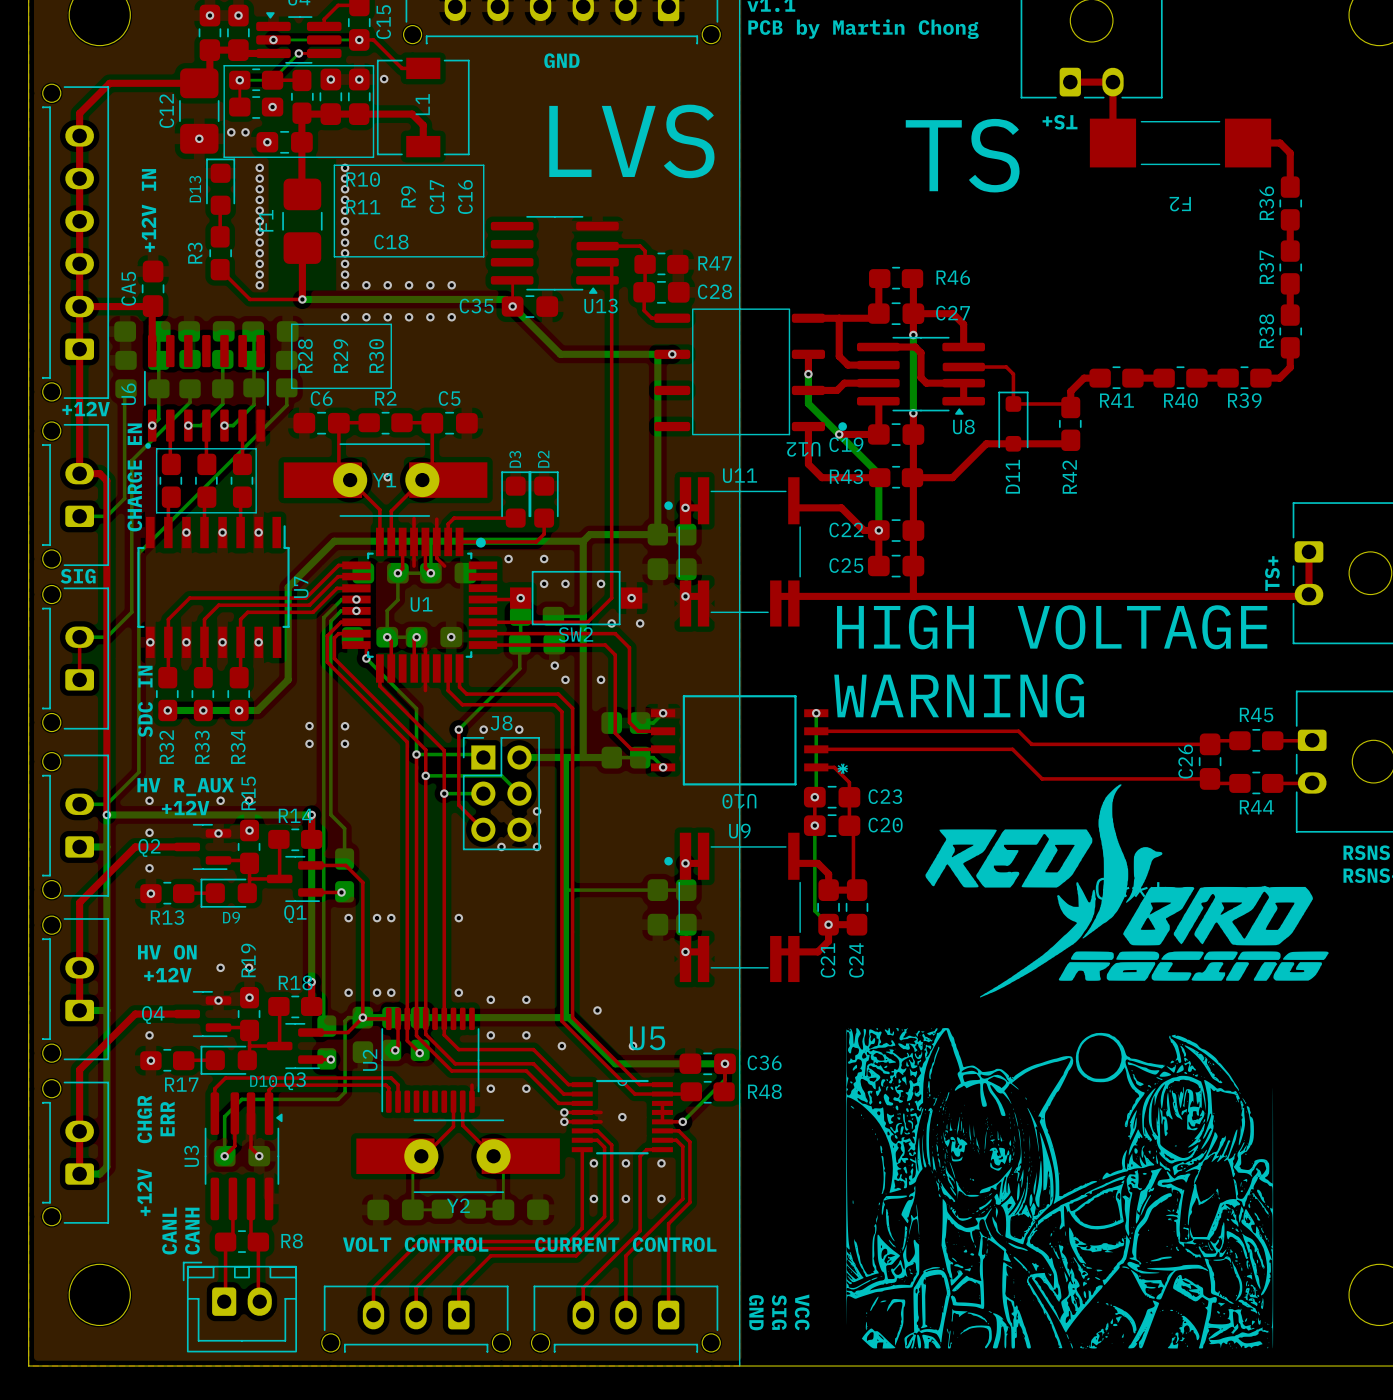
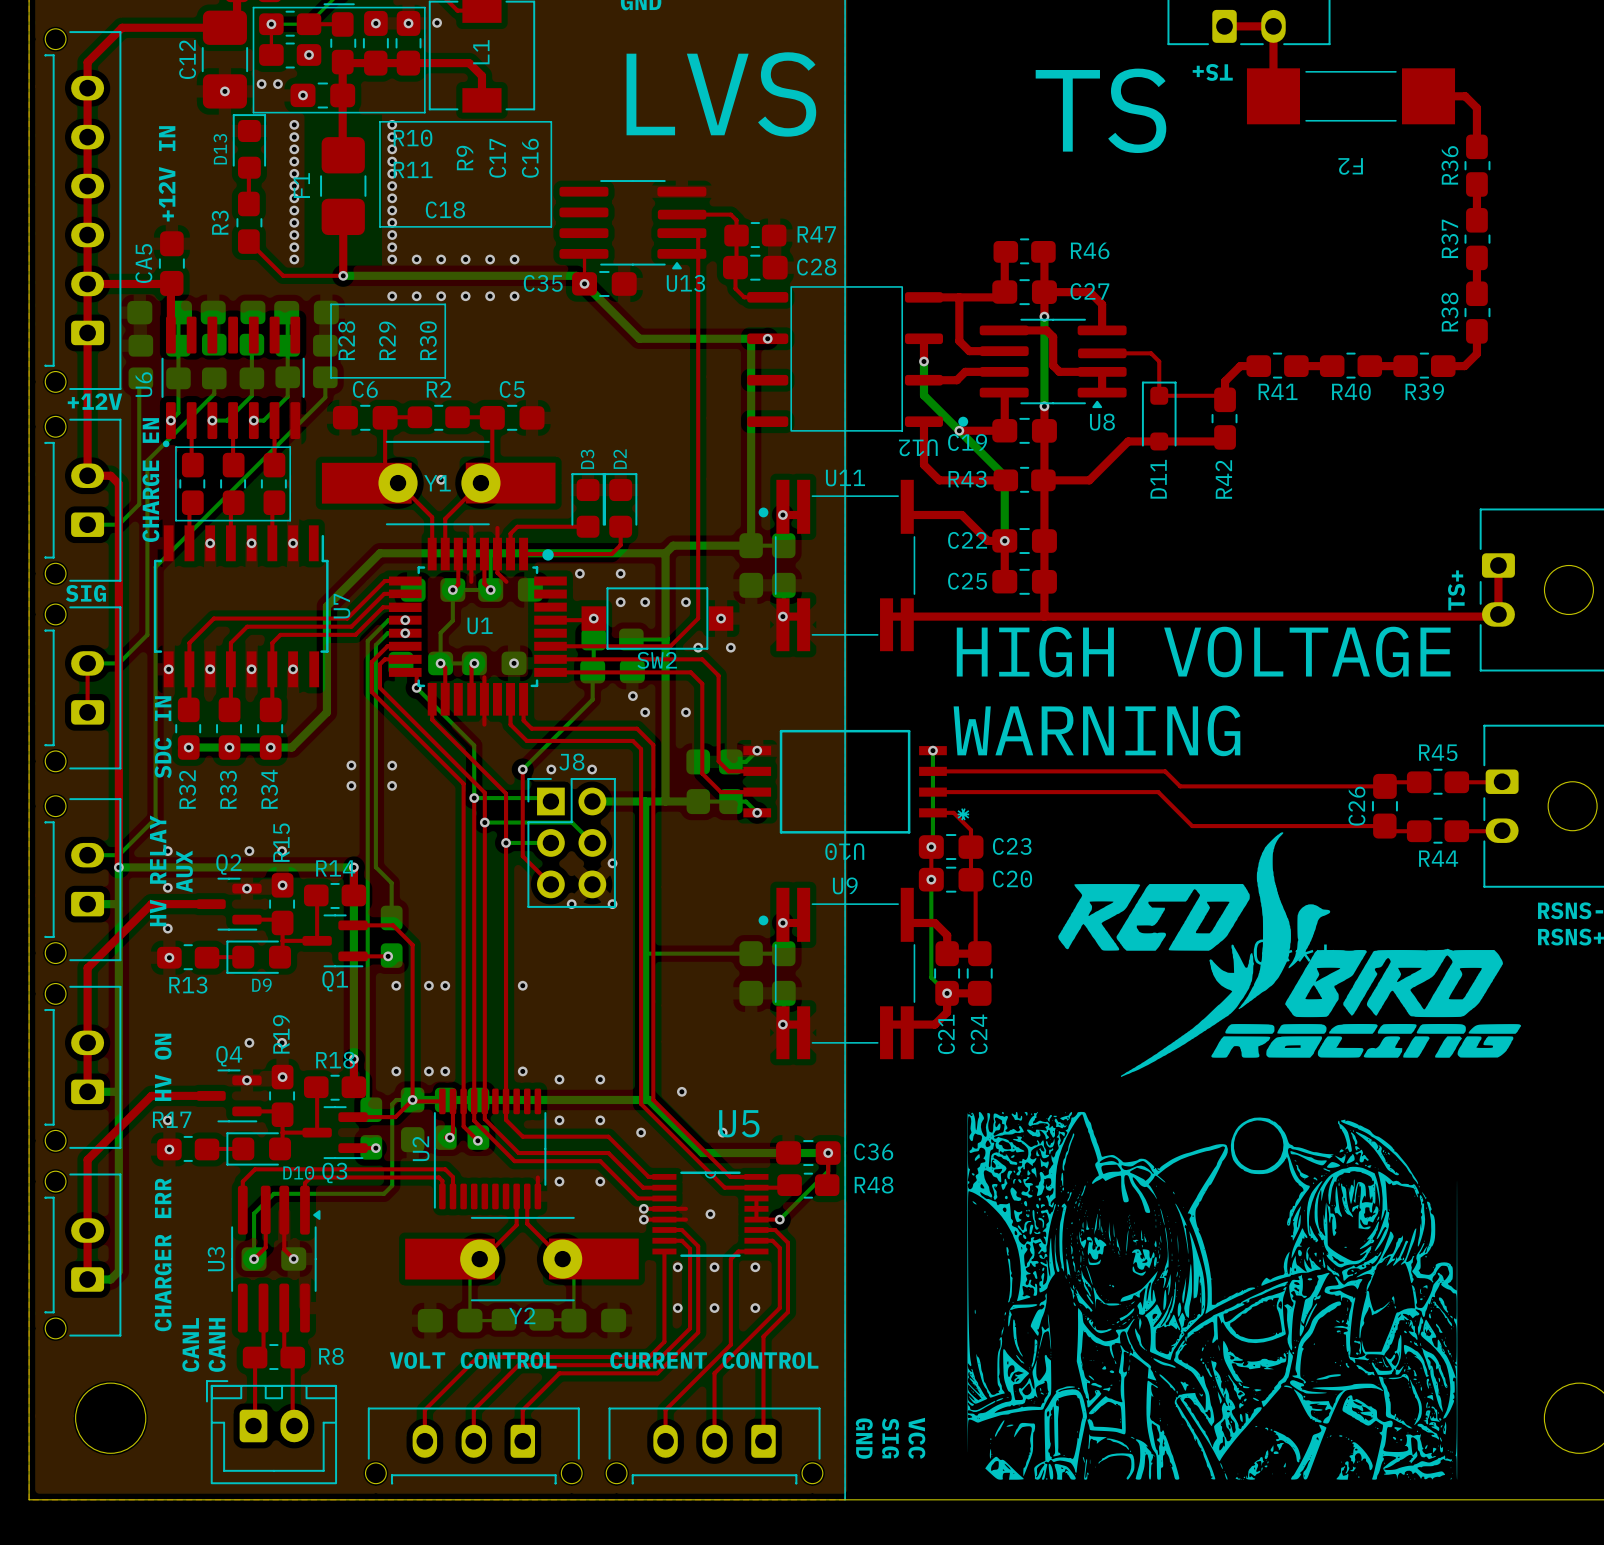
text: HV R_AUX (185, 787) -> HV RELAY (158, 870)
text: +12V (185, 807) -> none
text: none -> AUX (184, 871)
Q2 name position: Q2 (149, 847) -> Q2 (228, 864)
text rotation: 0° (167, 952) -> 90° counterclockwise (163, 1067)
text: +12V (167, 975) -> none
Q4 name position: Q4 (153, 1015) -> Q4 (229, 1056)
R17 name position: R17 (181, 1084) -> R17 (172, 1119)
text: ERR (167, 1119) -> none
text: +12V CHGR (144, 1155) -> CHARGER ERR (163, 1254)

